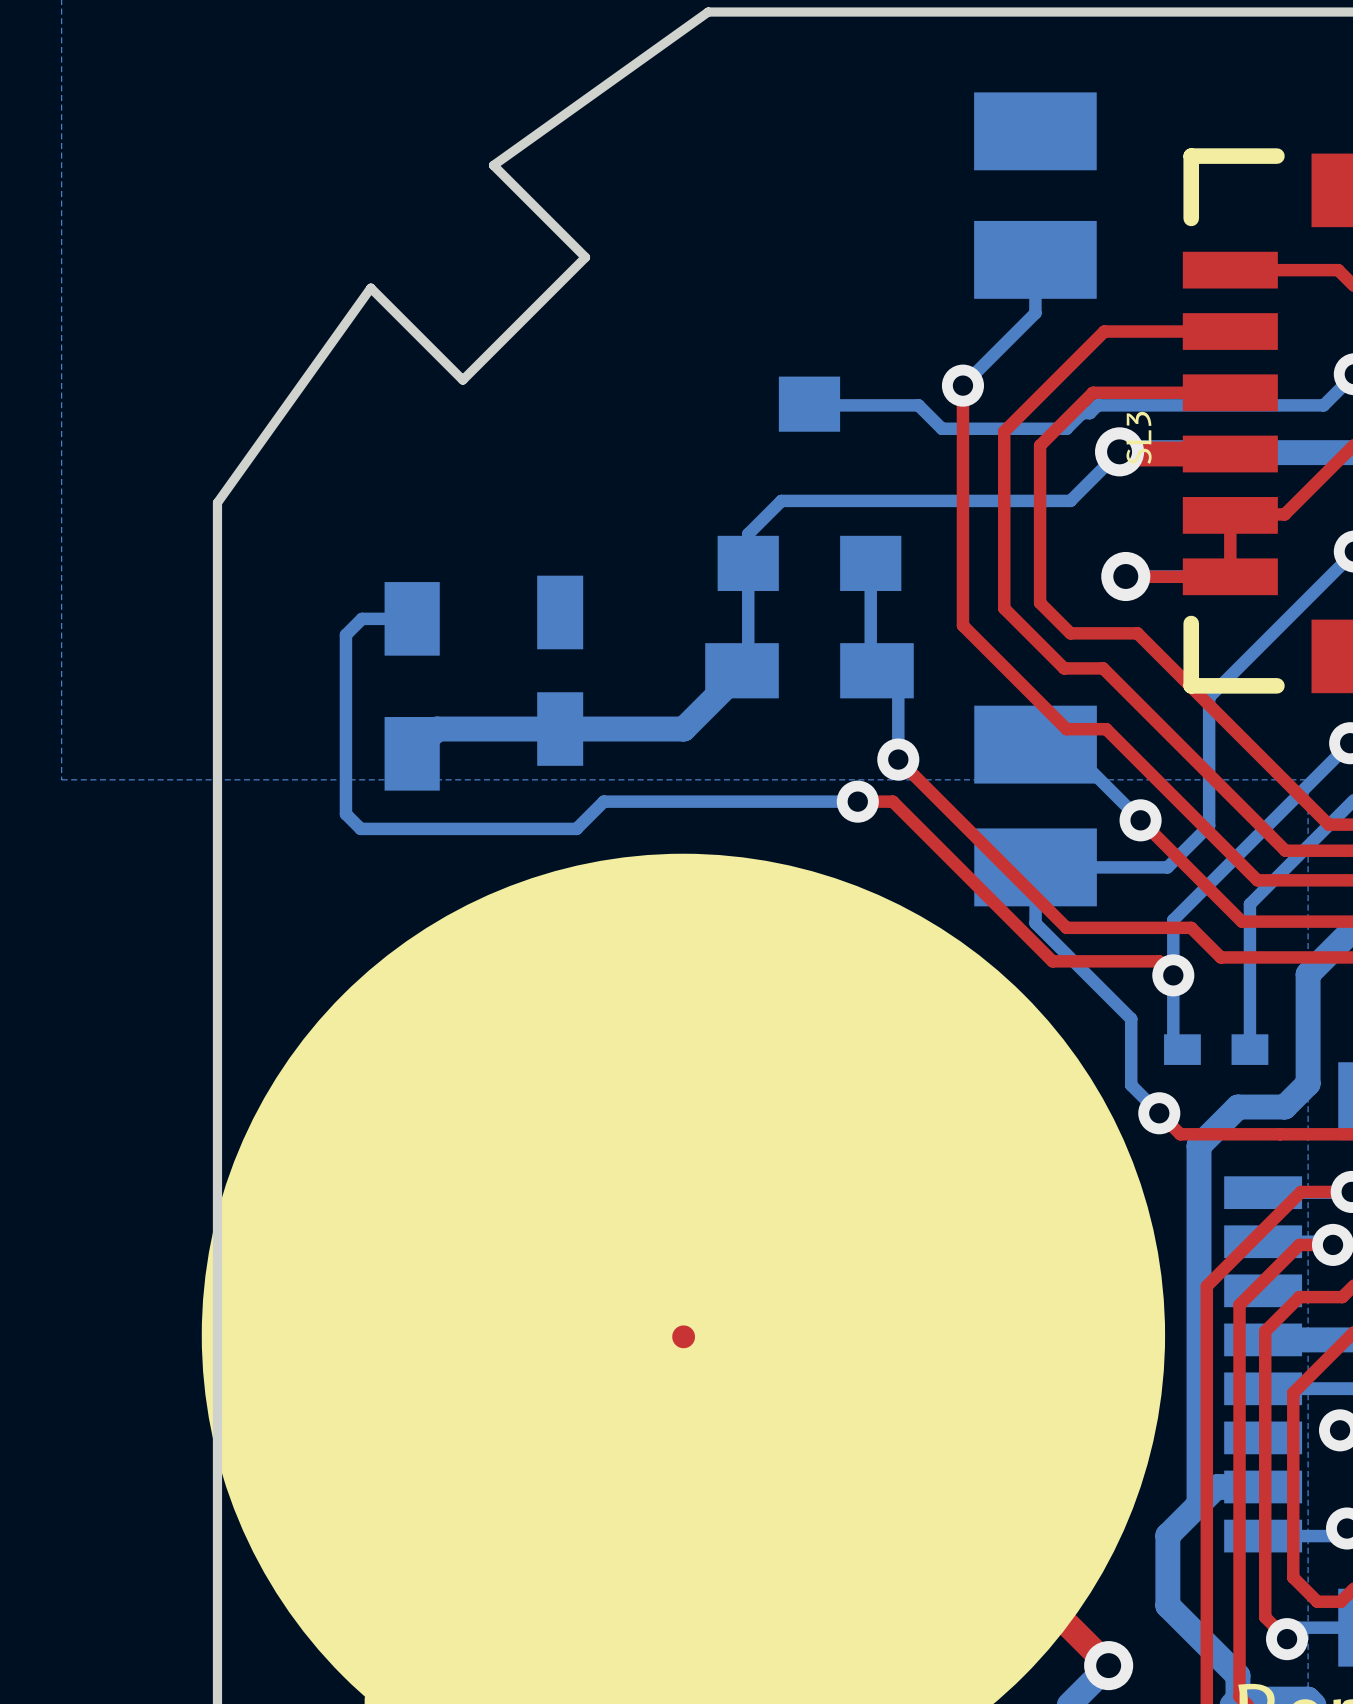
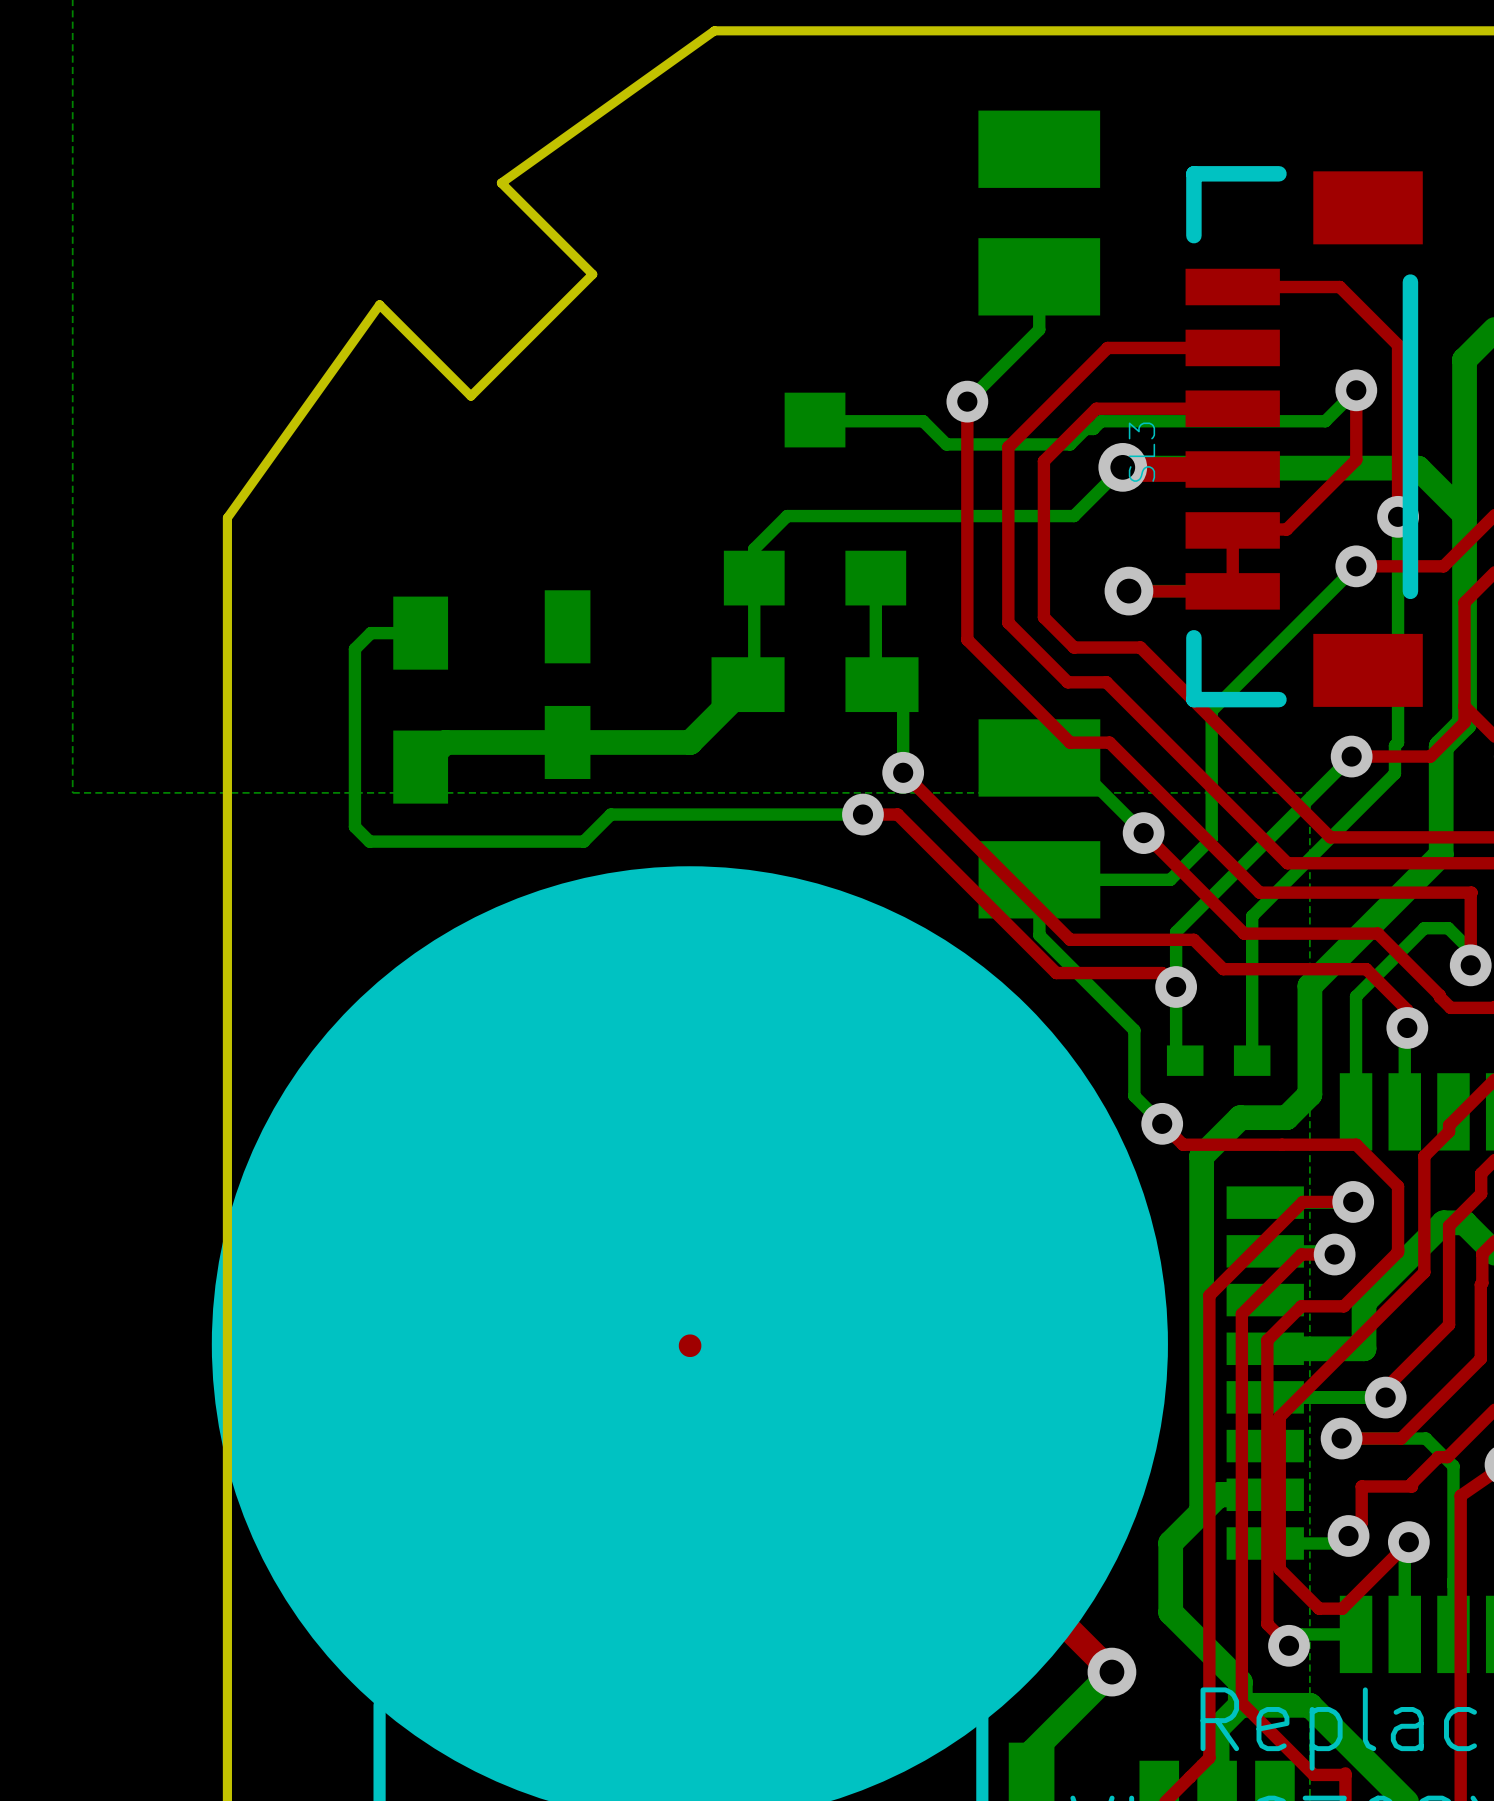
top track: (1293, 1392) (1293, 1577) -> (1295, 1401) (1279, 1416) (1279, 1569) (1295, 1584)

